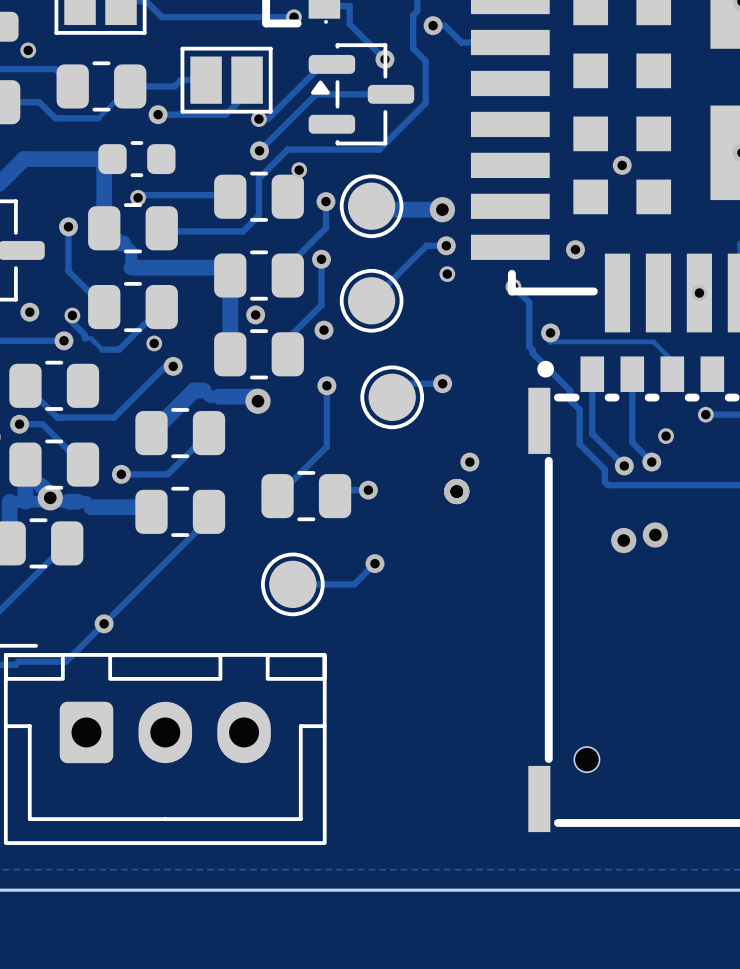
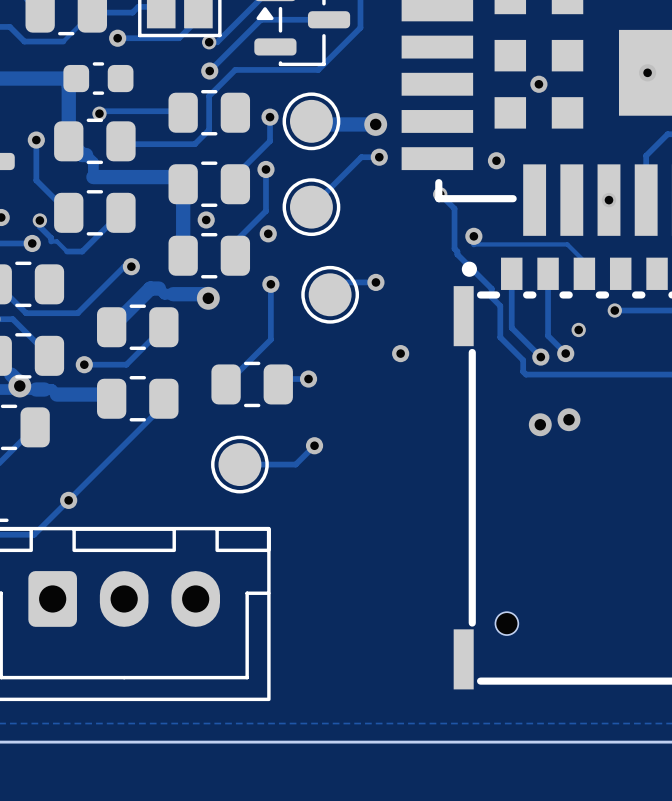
via: (299, 170) -> none
via: (447, 274) -> none
via: (154, 343) -> none
via: (456, 491) -> none

